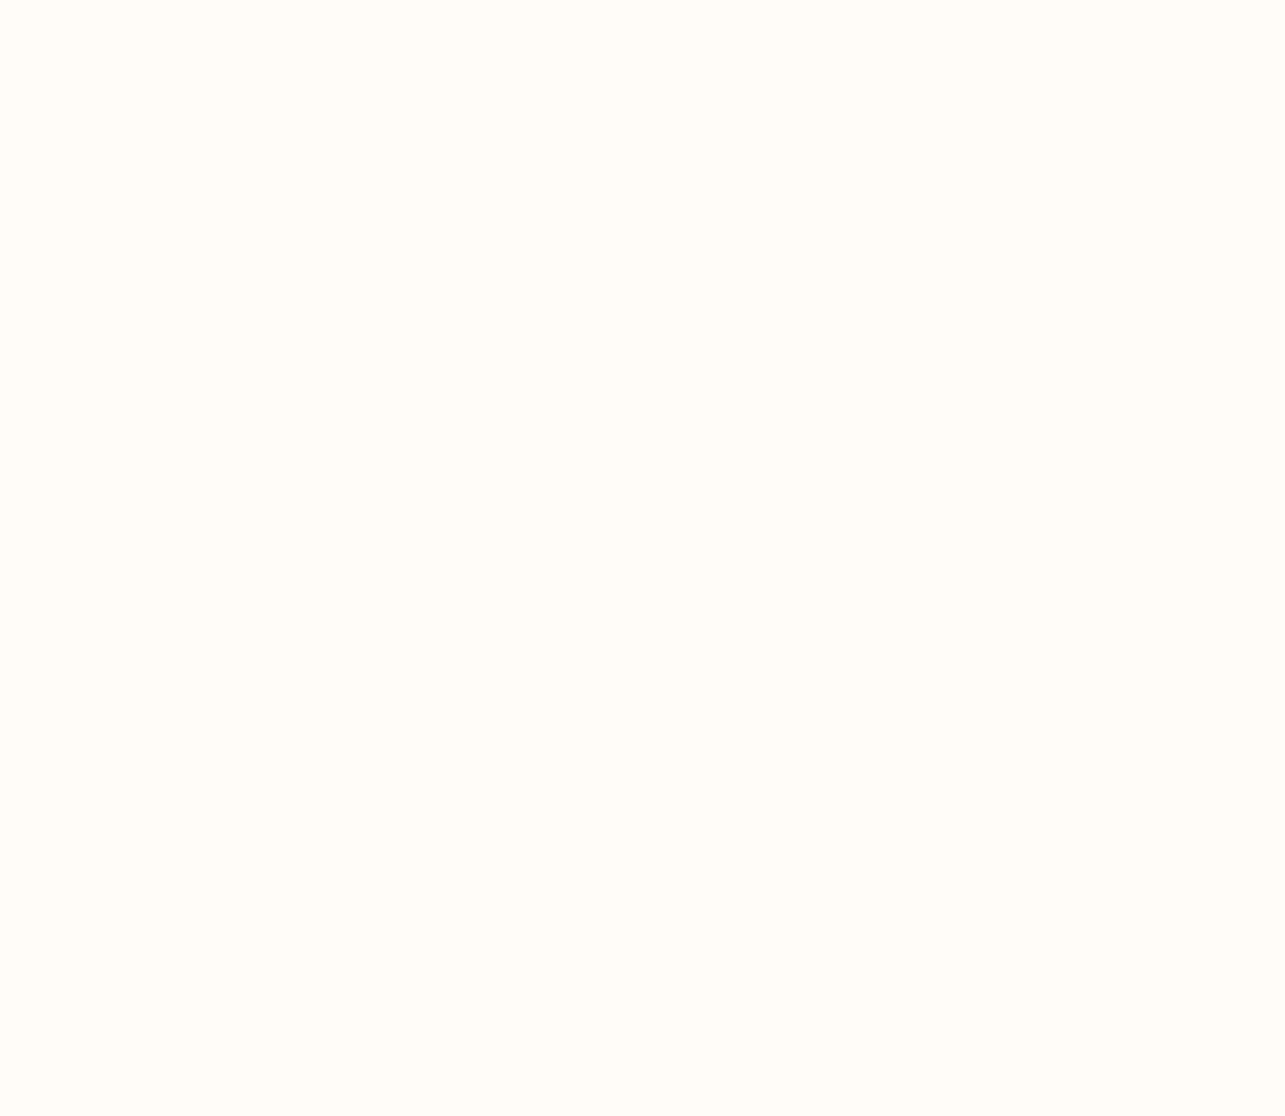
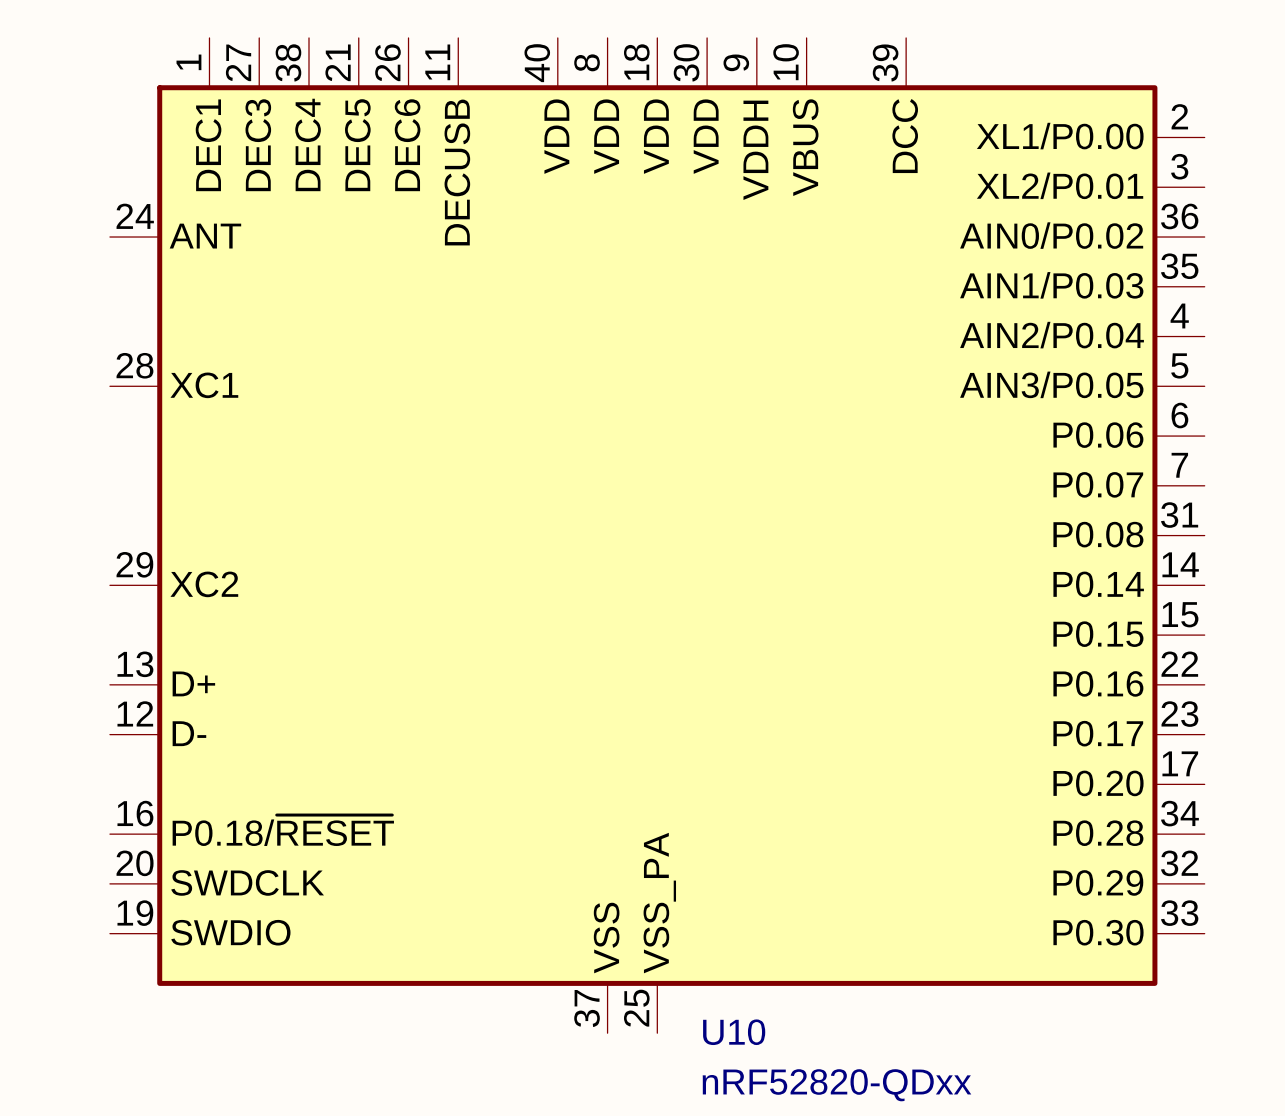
U10: none -> nRF52820-QDxx (657, 535)

